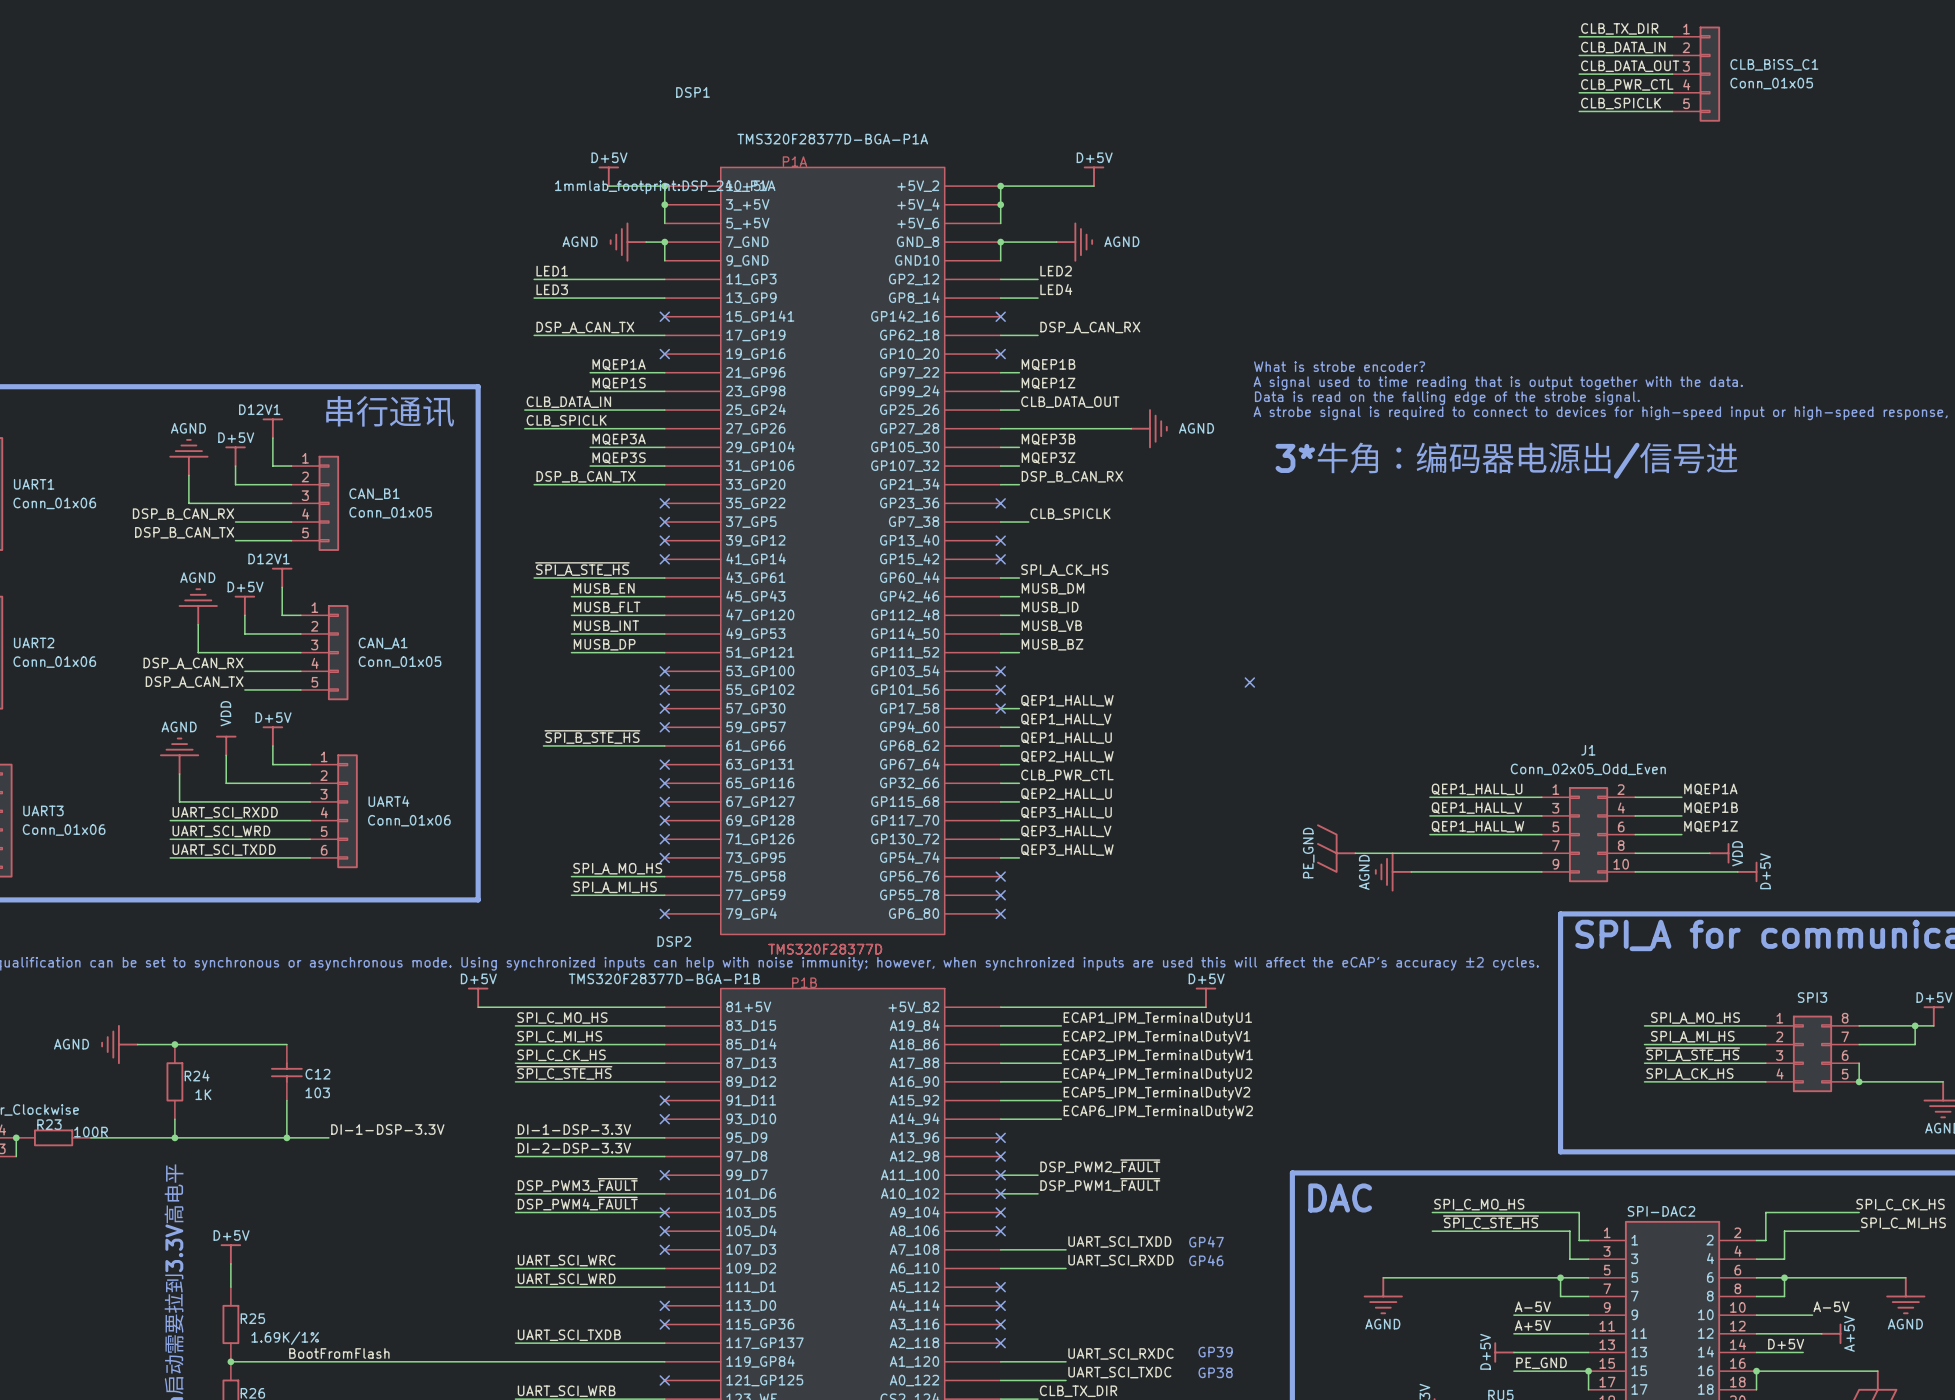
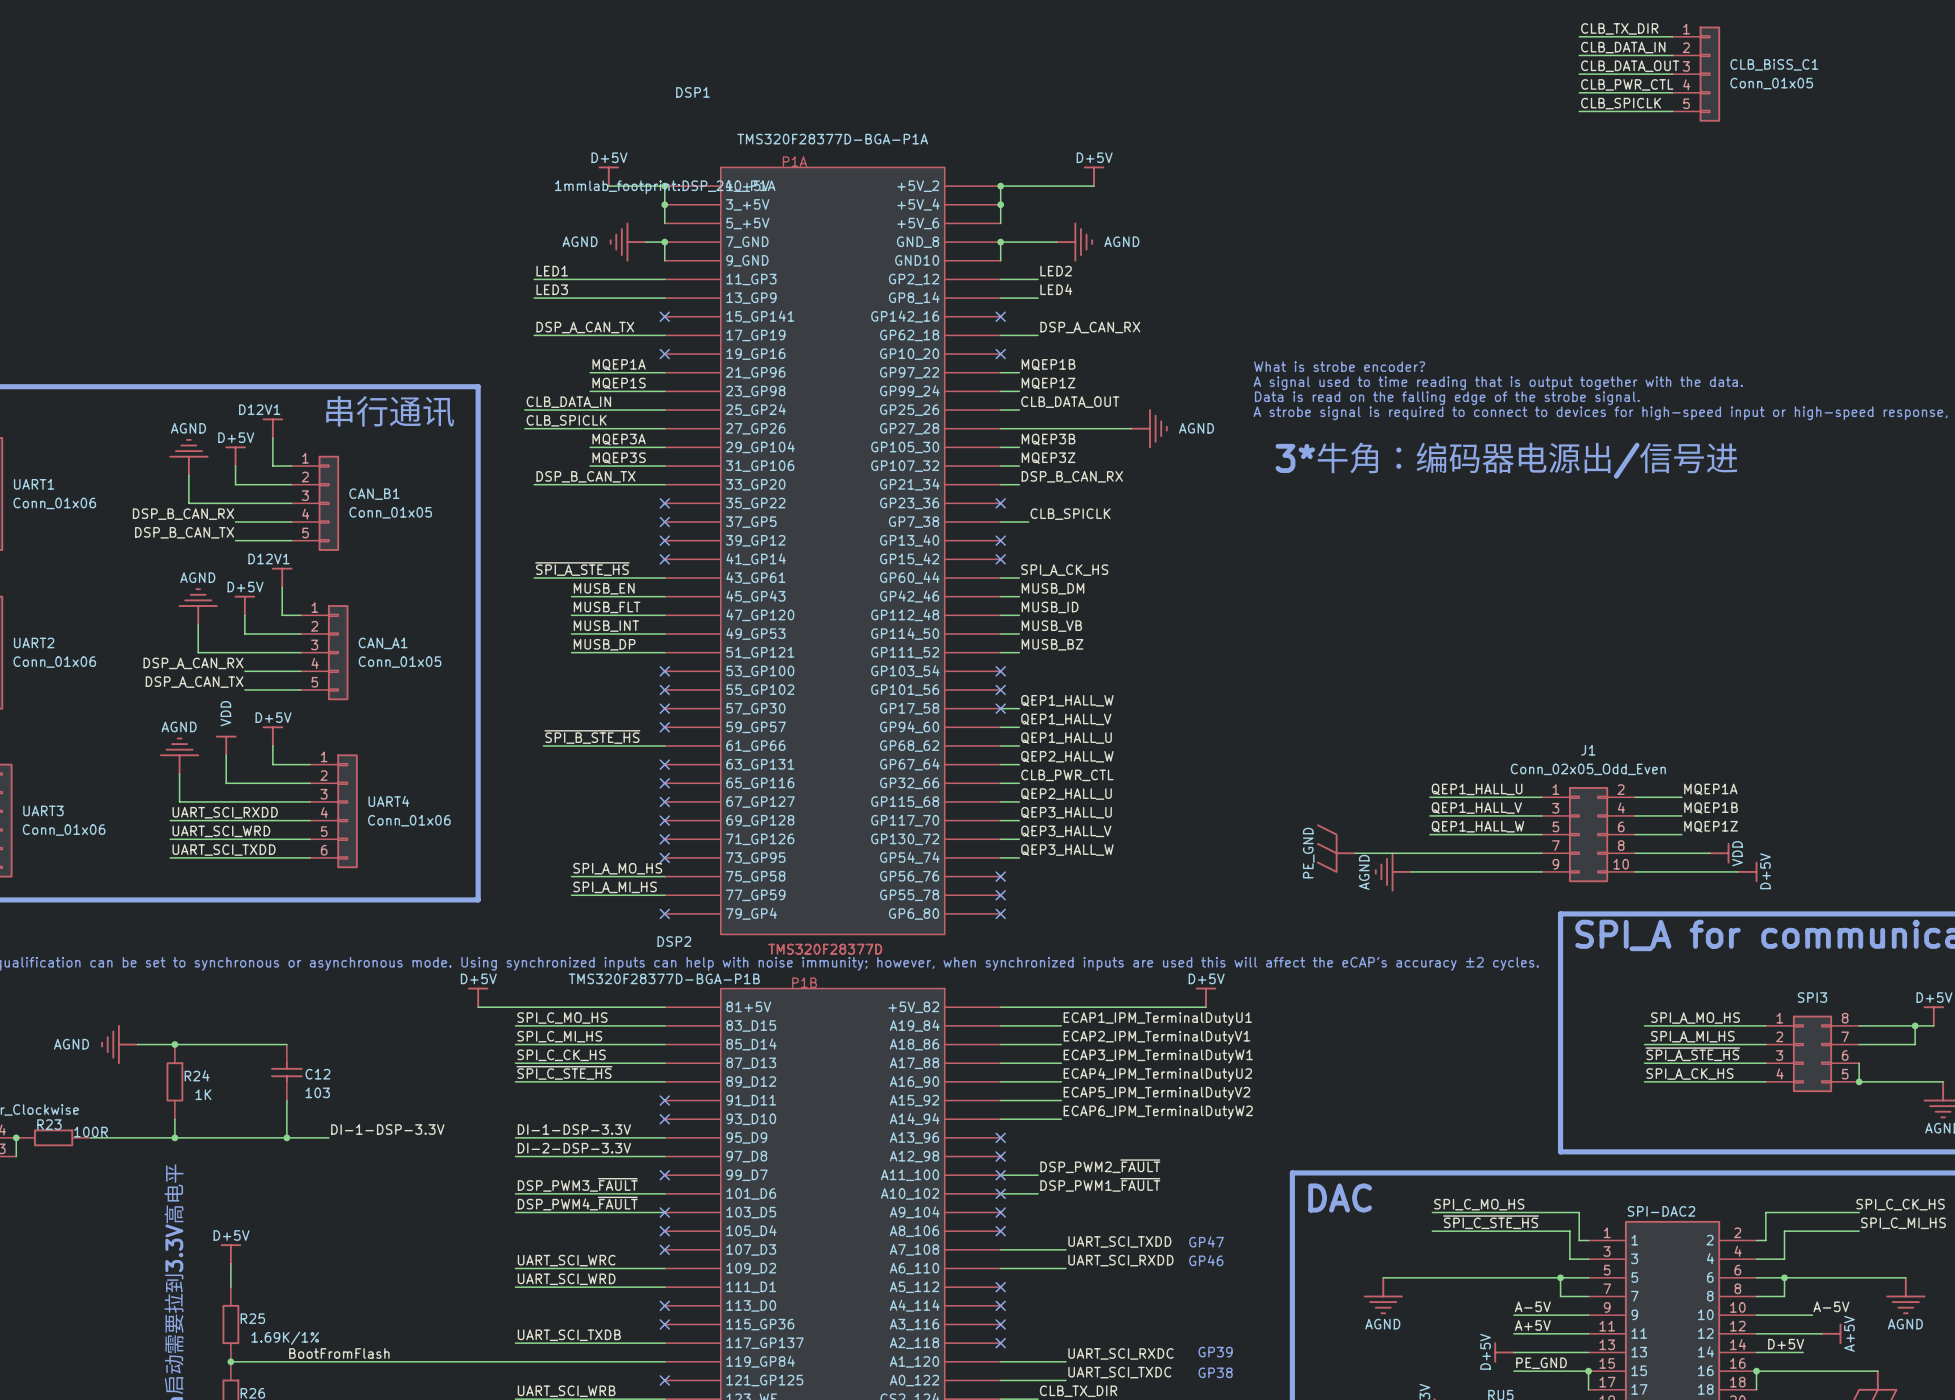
no-connect mark: (1249, 682) -> none

